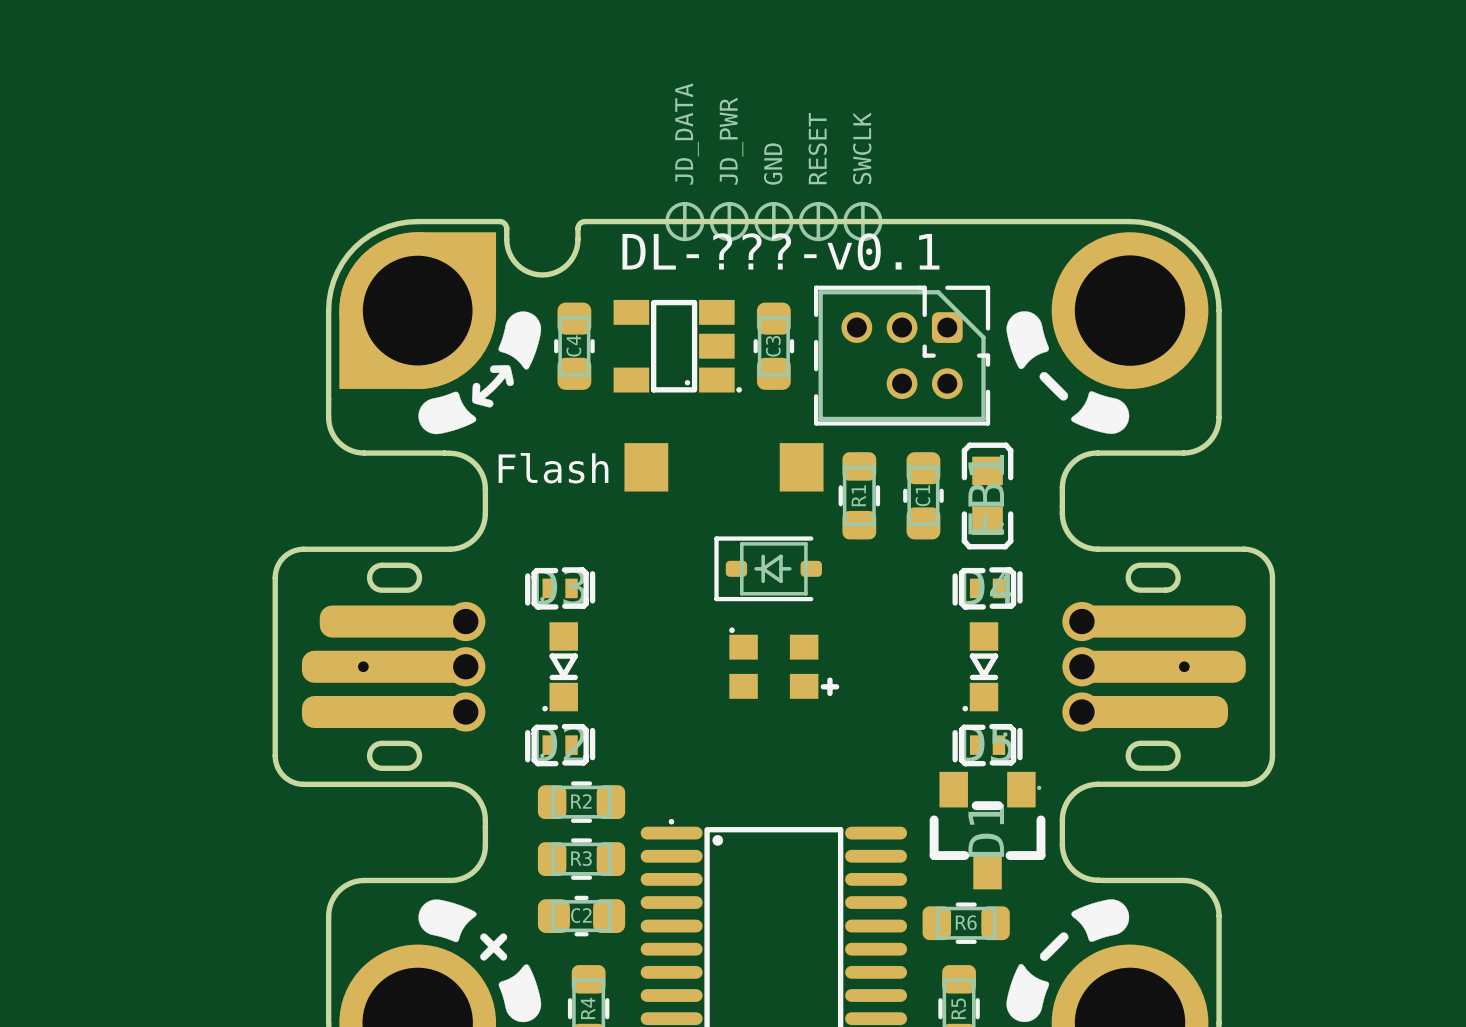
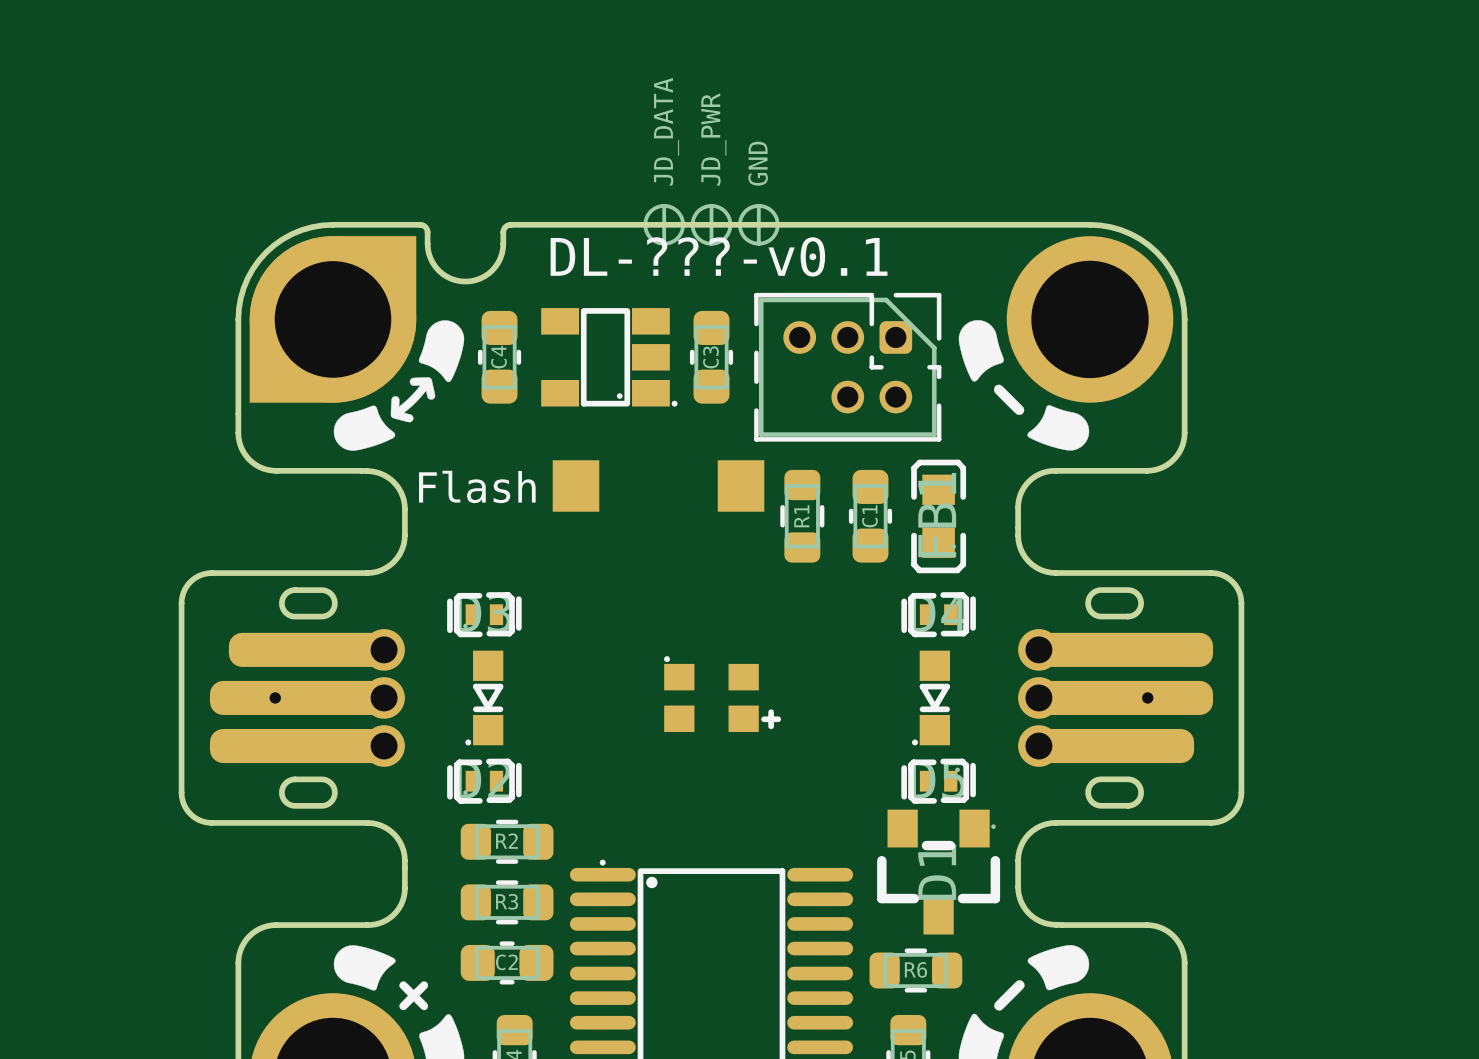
part value: JD_PWR (731, 141) -> JD_DATA (666, 131)
part value: RESET (817, 148) -> GND (758, 163)
part value: GND (773, 164) -> JD_PWR (713, 139)
part: JD_DATA (684, 221) -> none
part: SWCLK (862, 221) -> none
part: (768, 568) -> none

